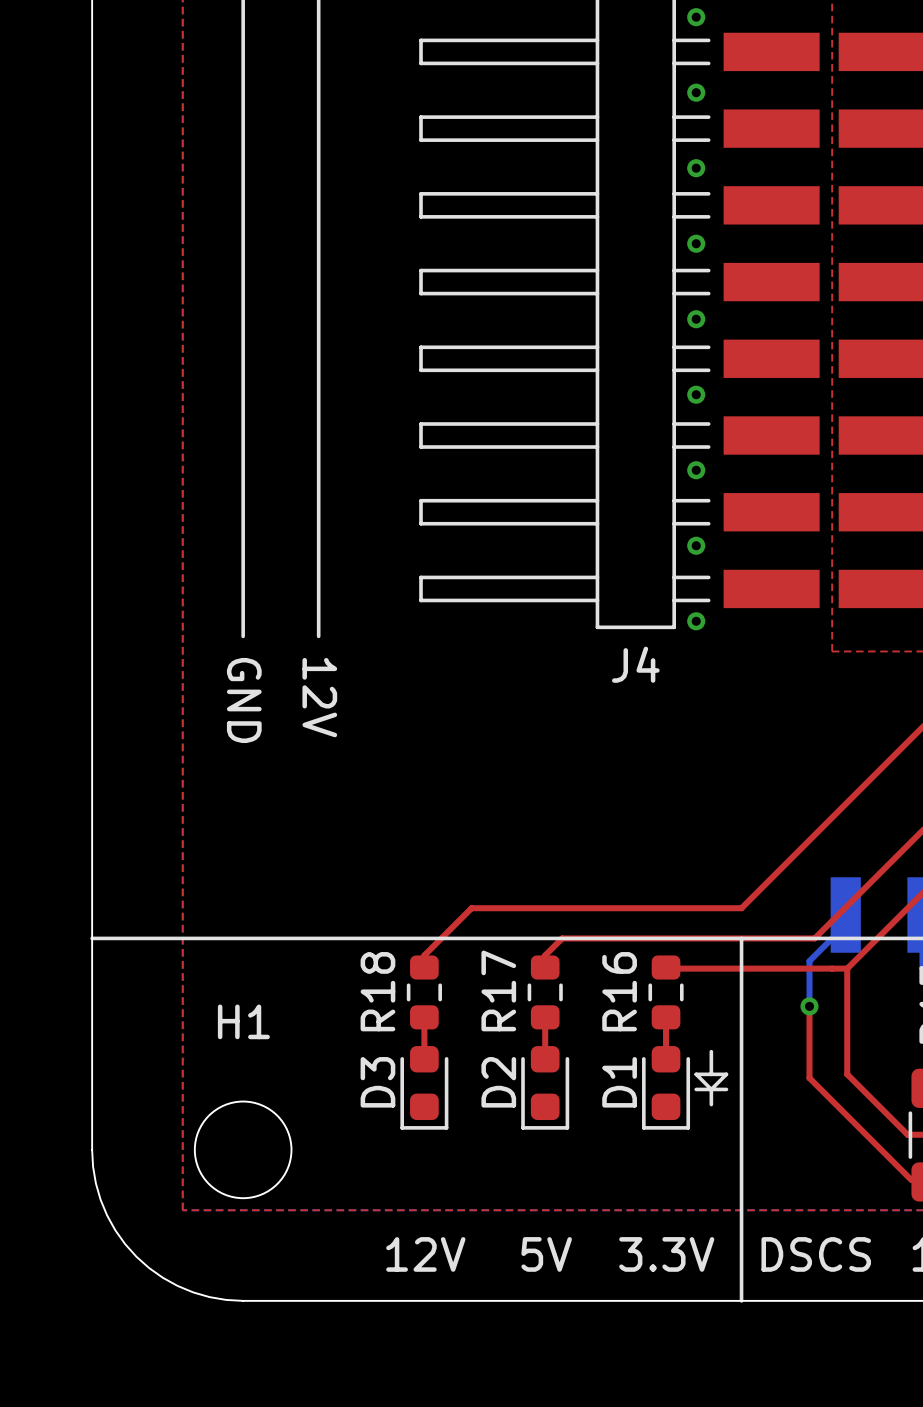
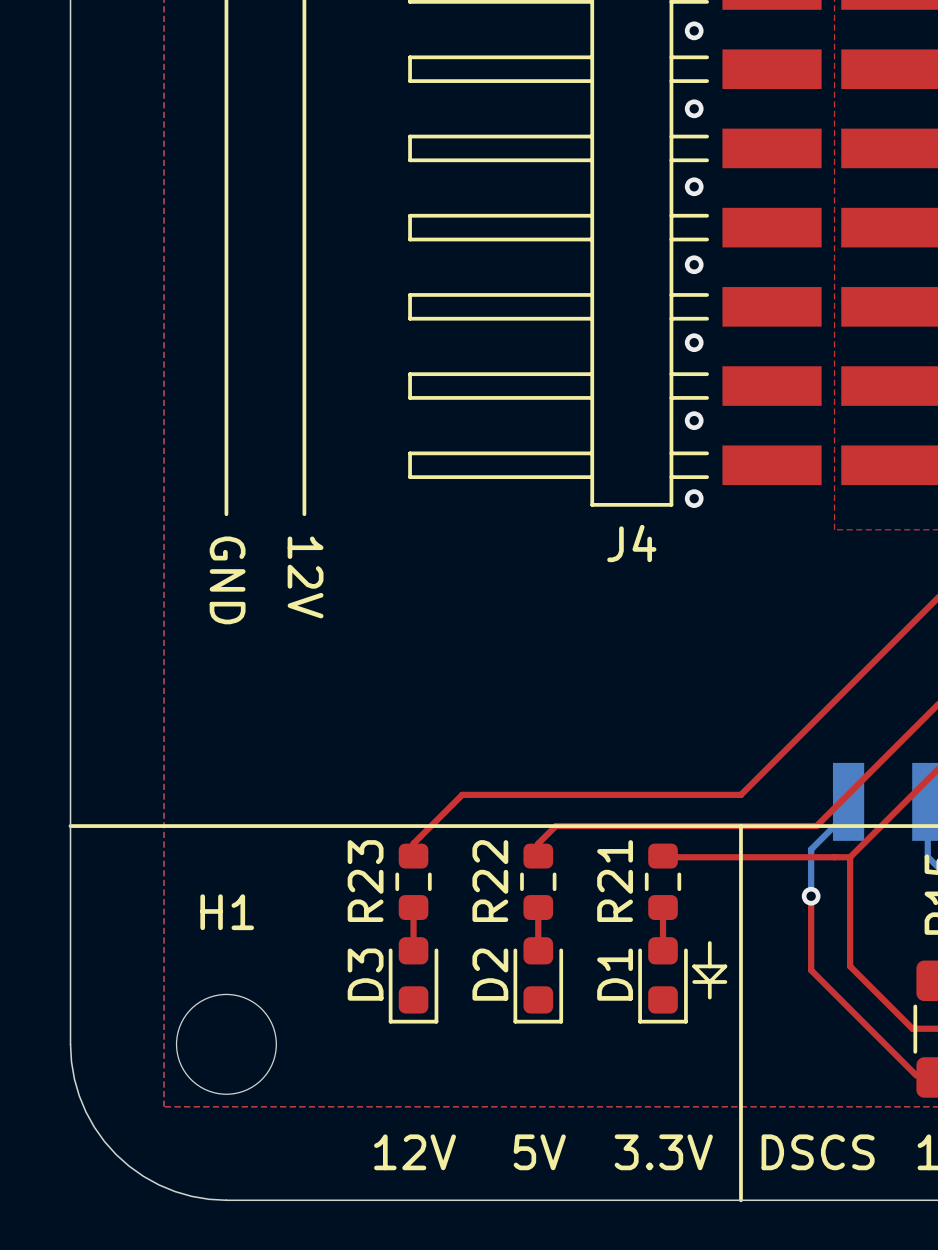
R17 name: R17 (498, 990) -> R22 (490, 881)
R18 name: R18 (377, 991) -> R23 (365, 881)
R16 name: R16 (619, 991) -> R21 (615, 881)

